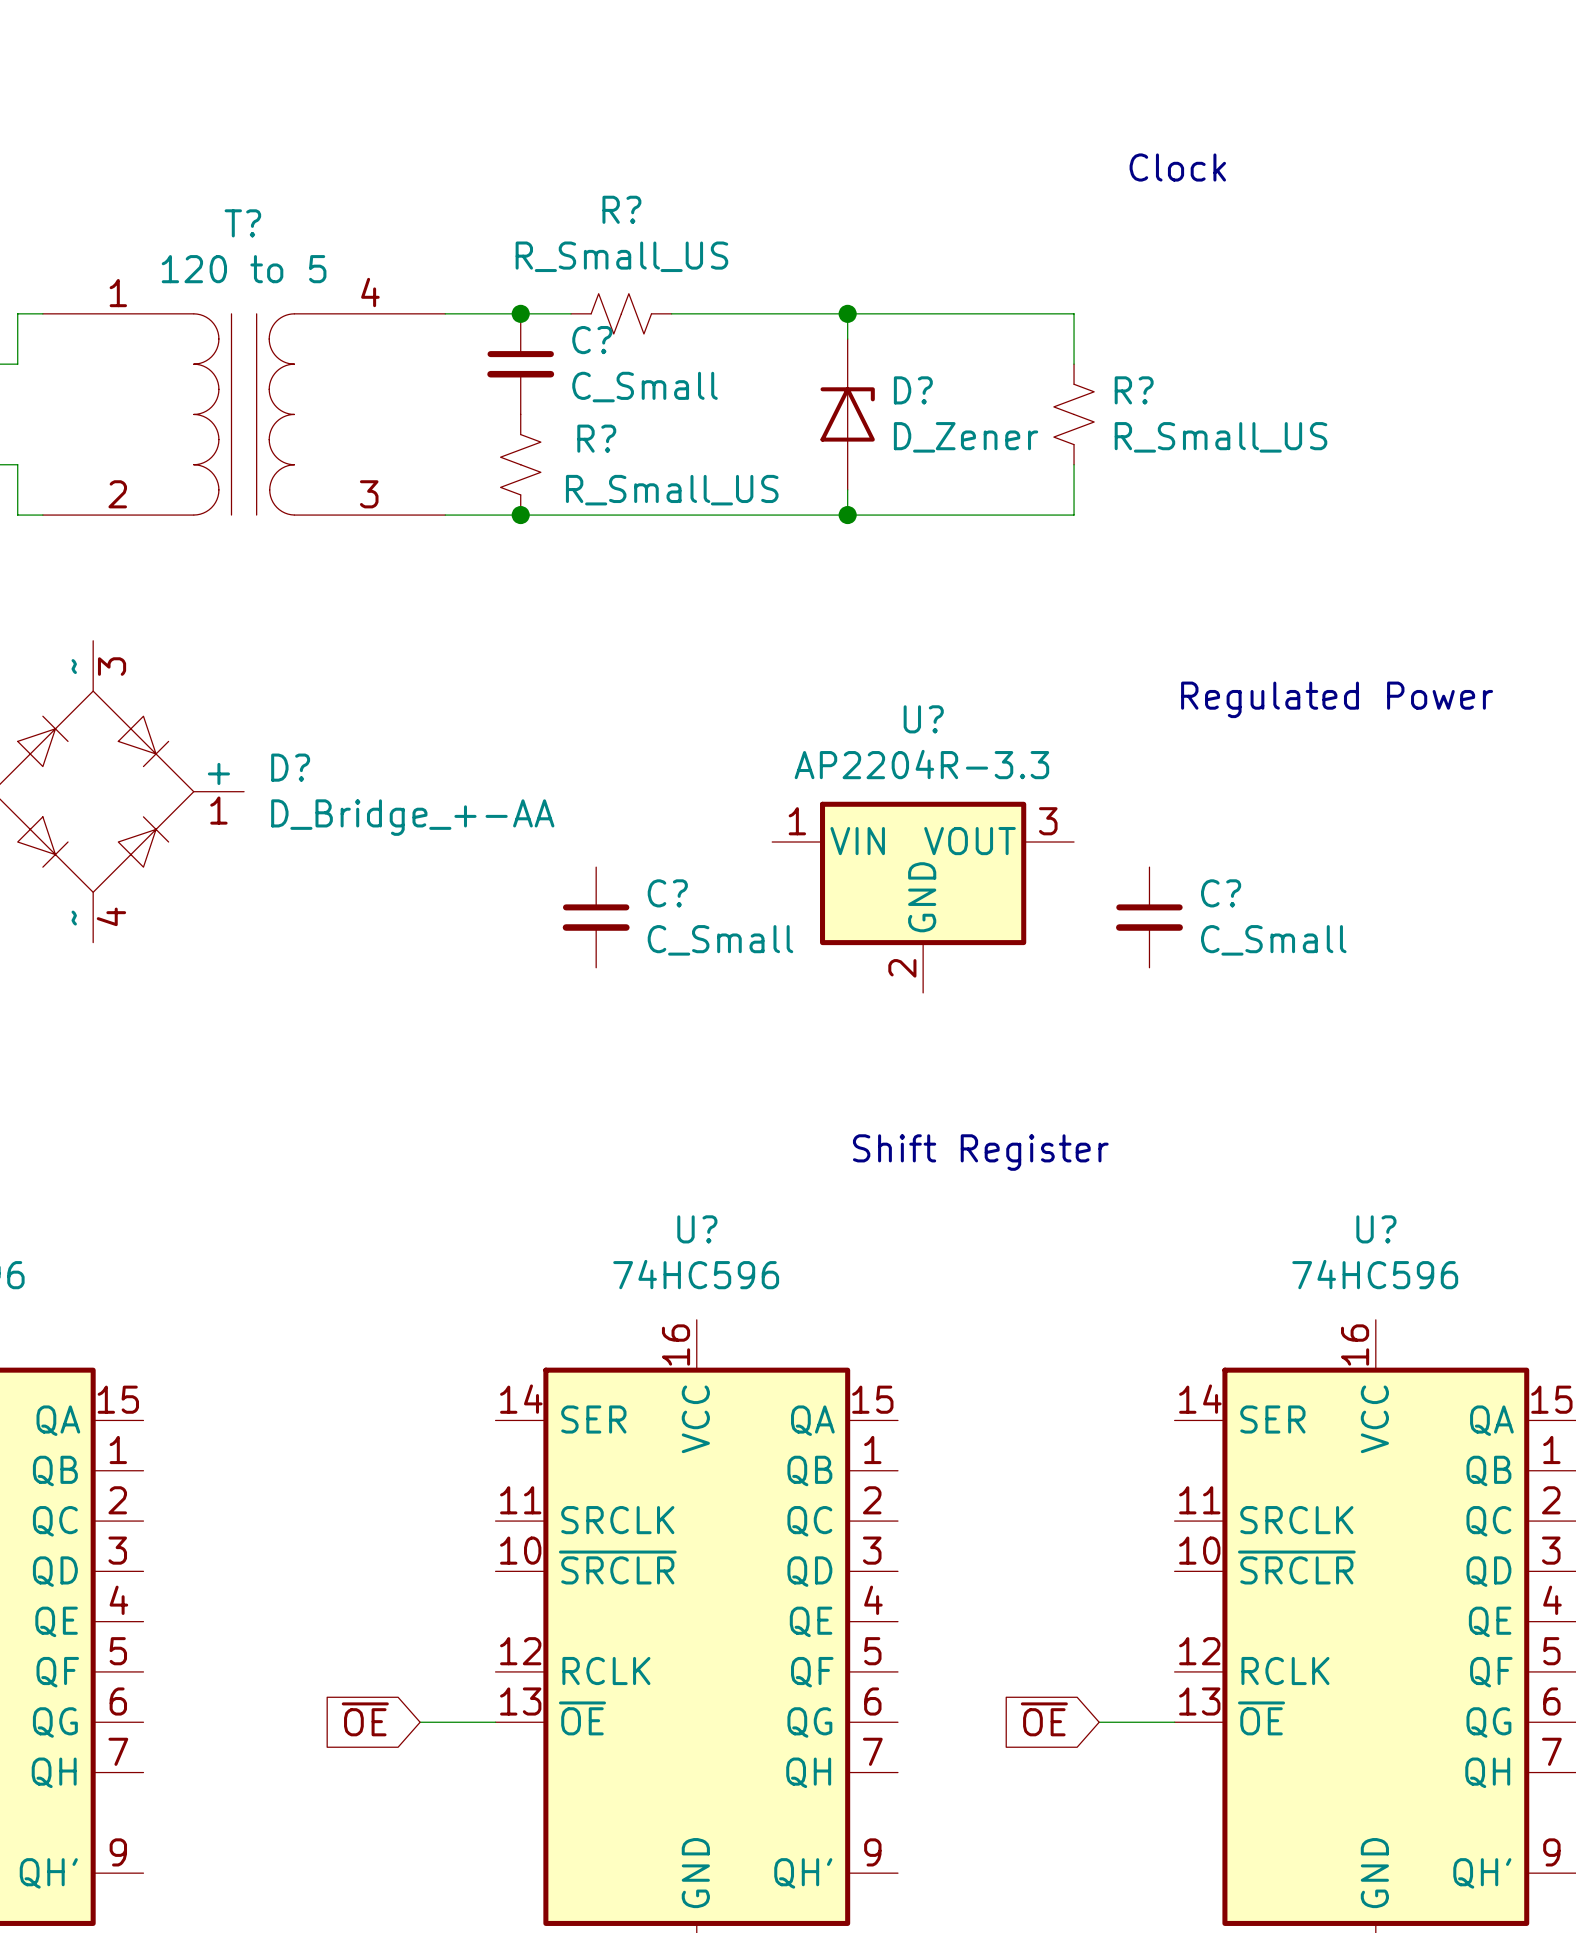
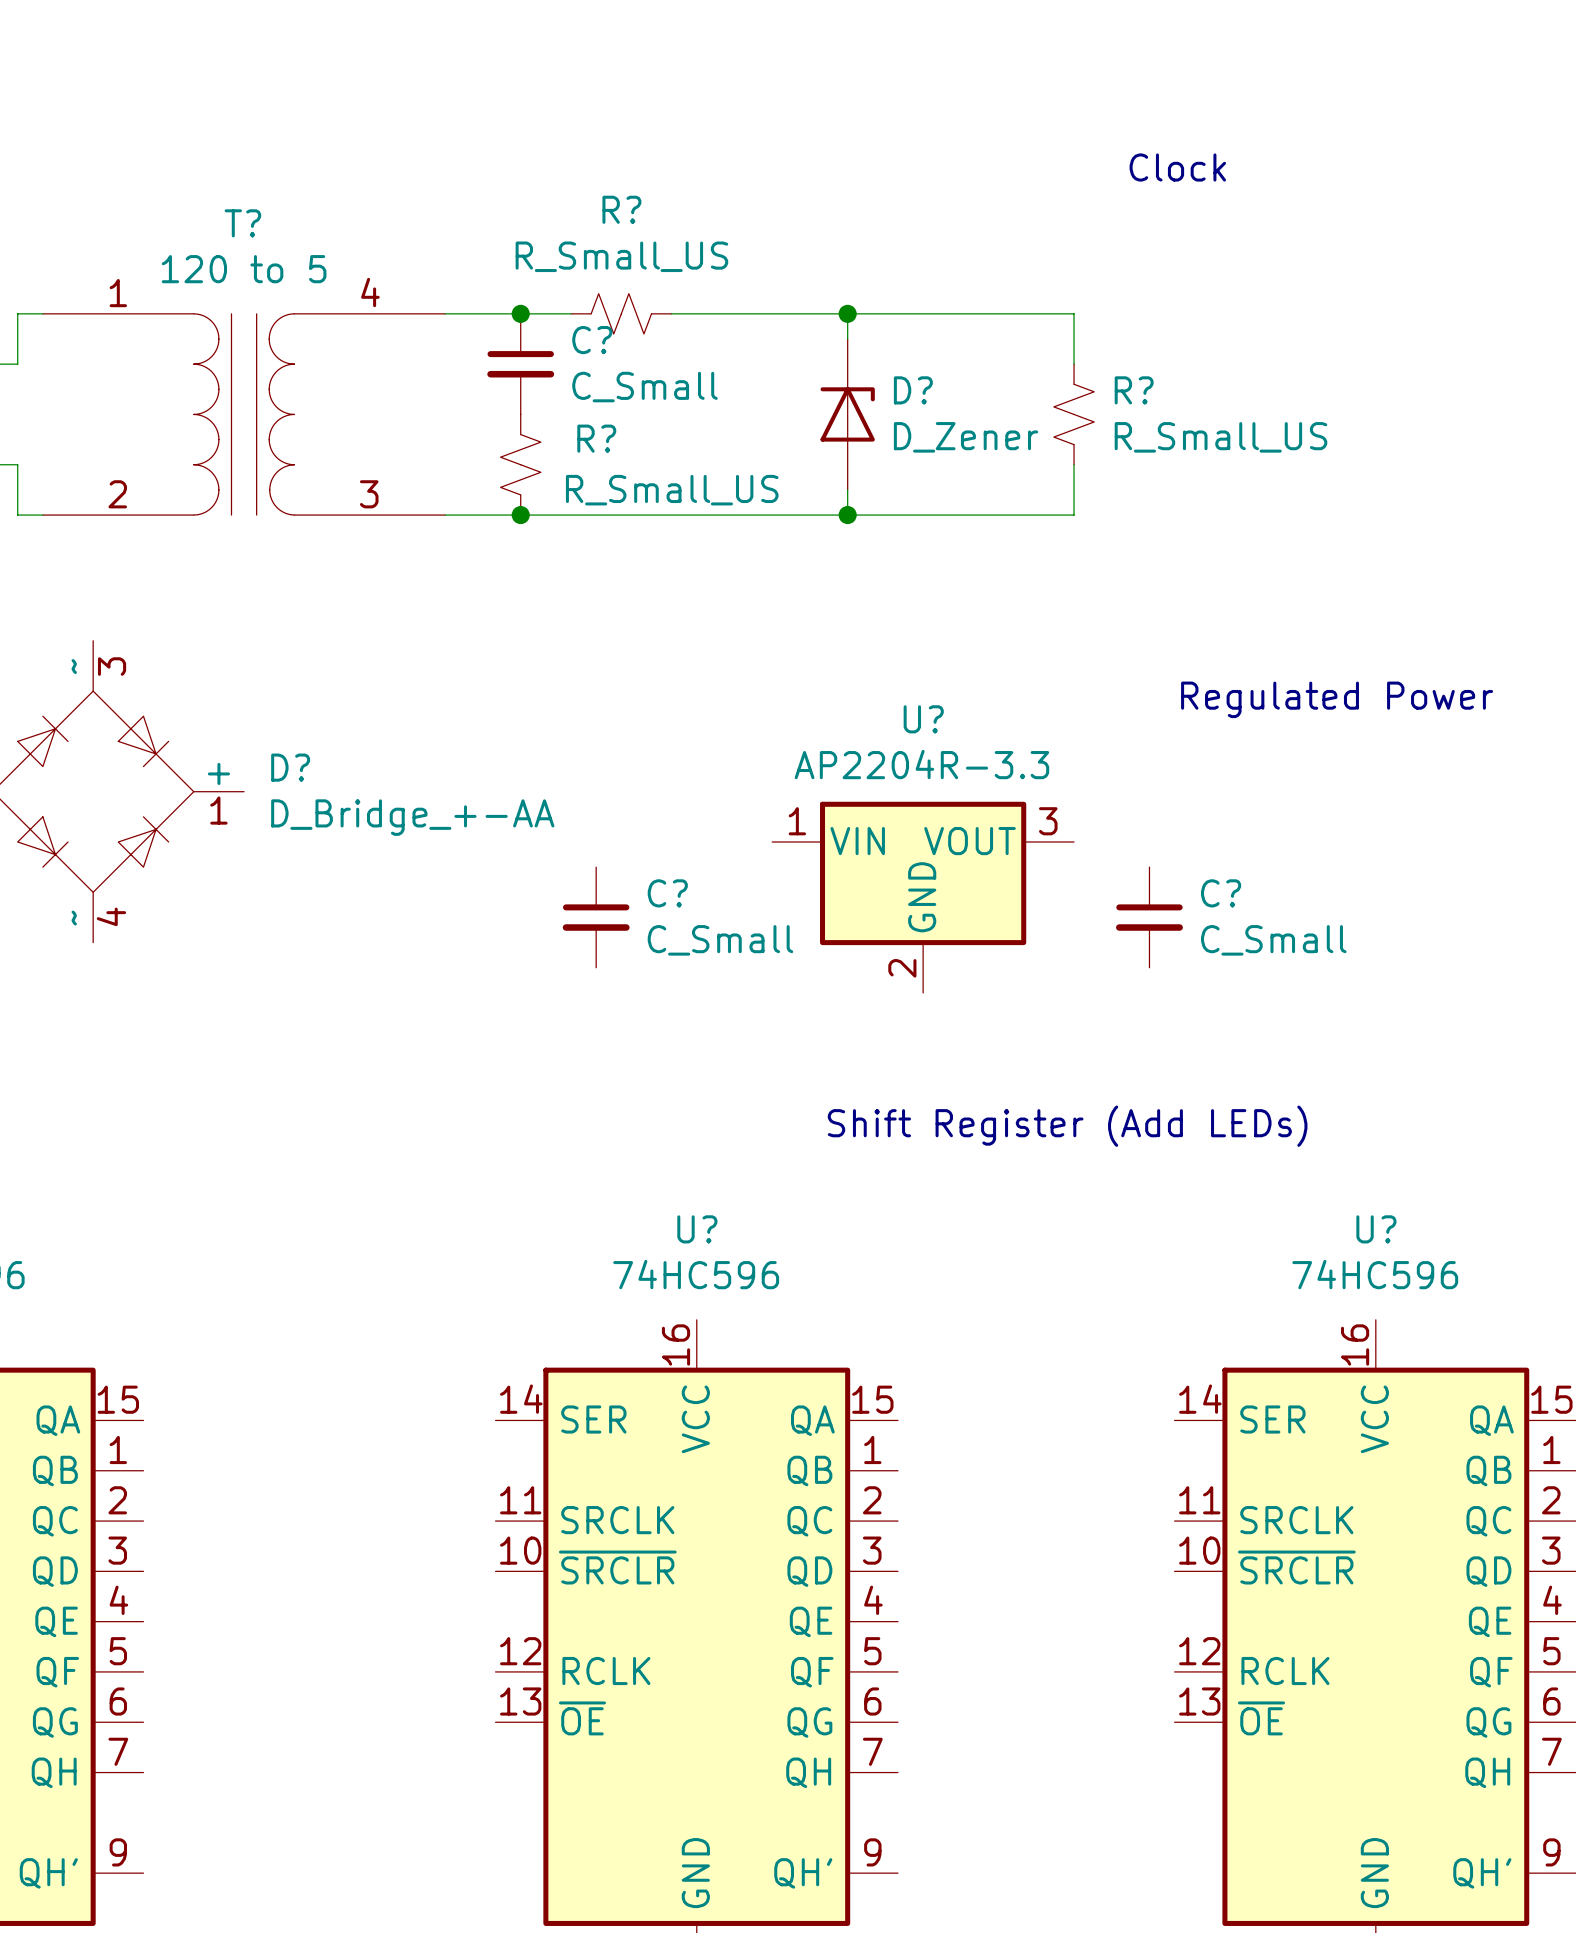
text: Shift Register (980, 1152) -> Shift Register (Add LEDs) (1067, 1126)
global label: ~{OE} (365, 1719) -> none
global label: ~{OE} (1044, 1719) -> none
wire: (420, 1722) (495, 1722) -> none
wire: (1099, 1722) (1174, 1722) -> none

